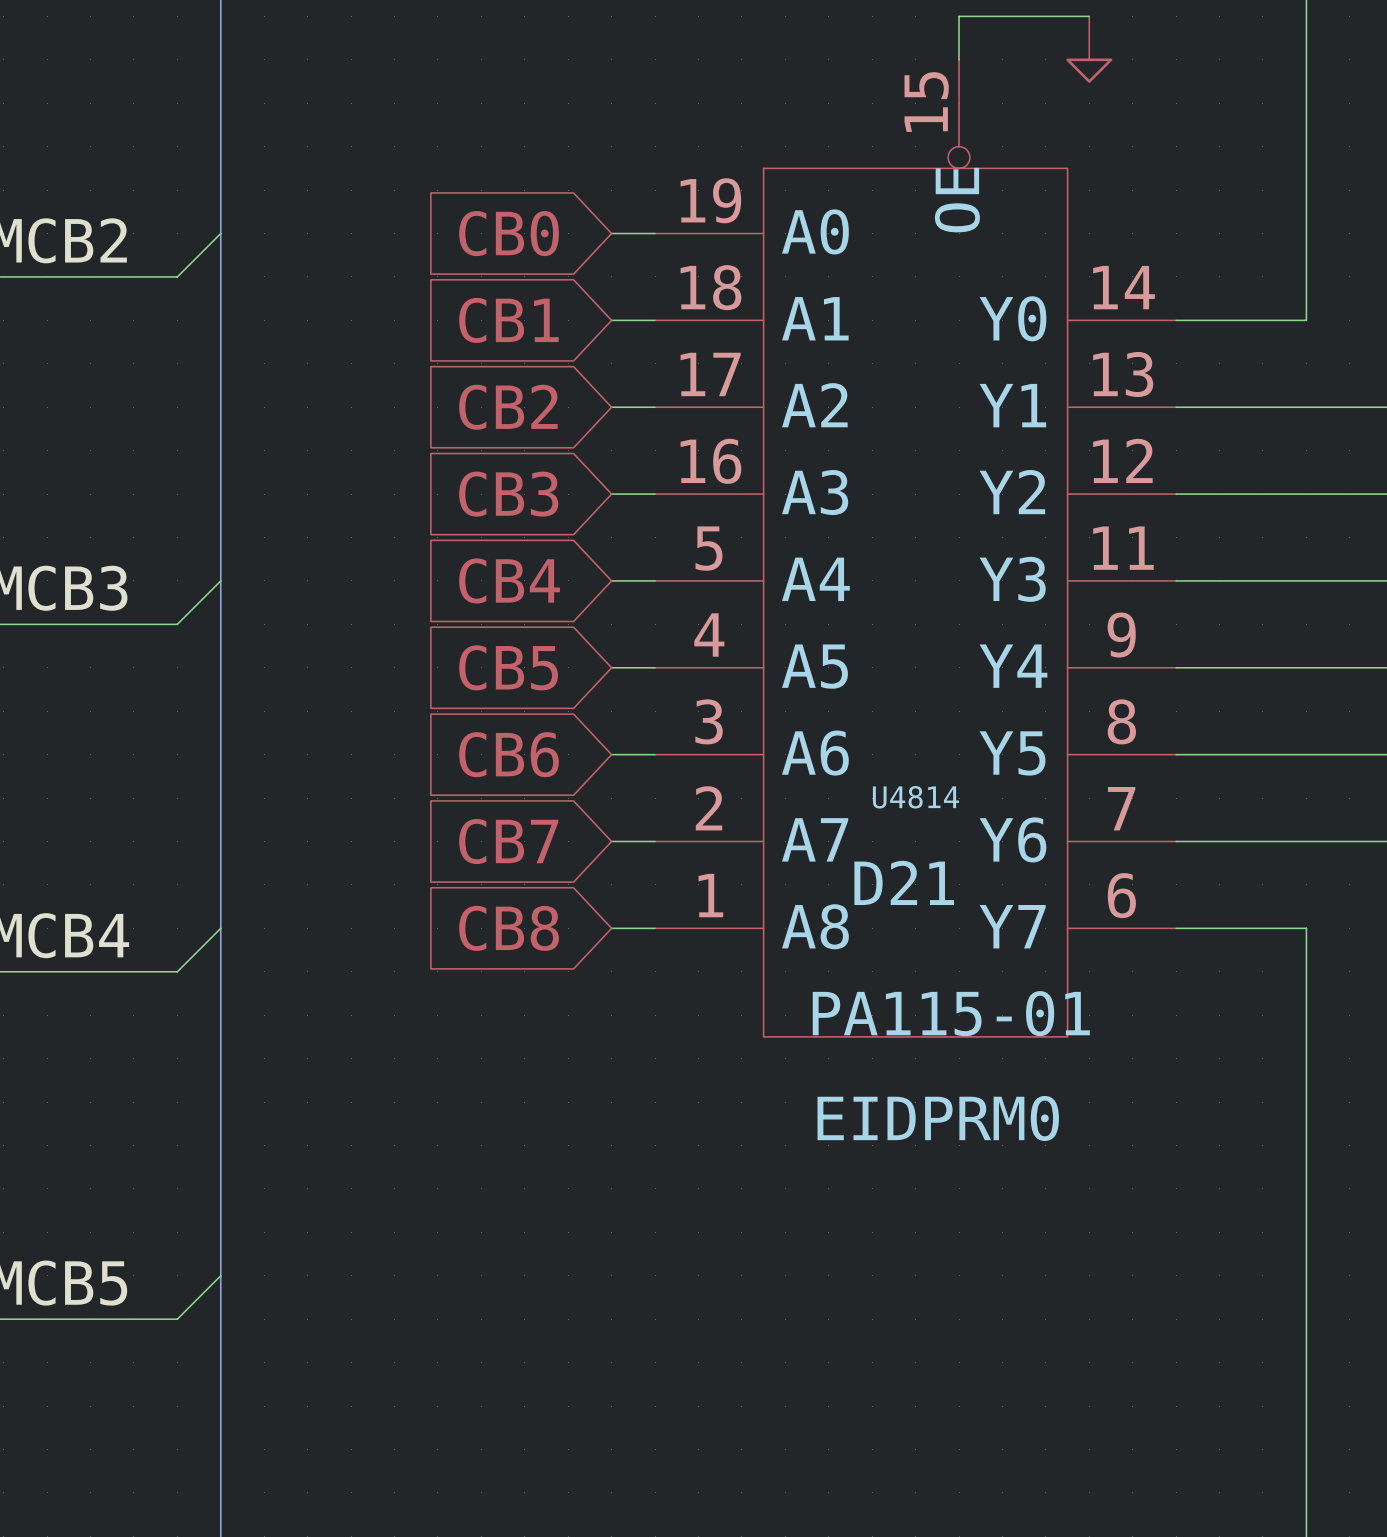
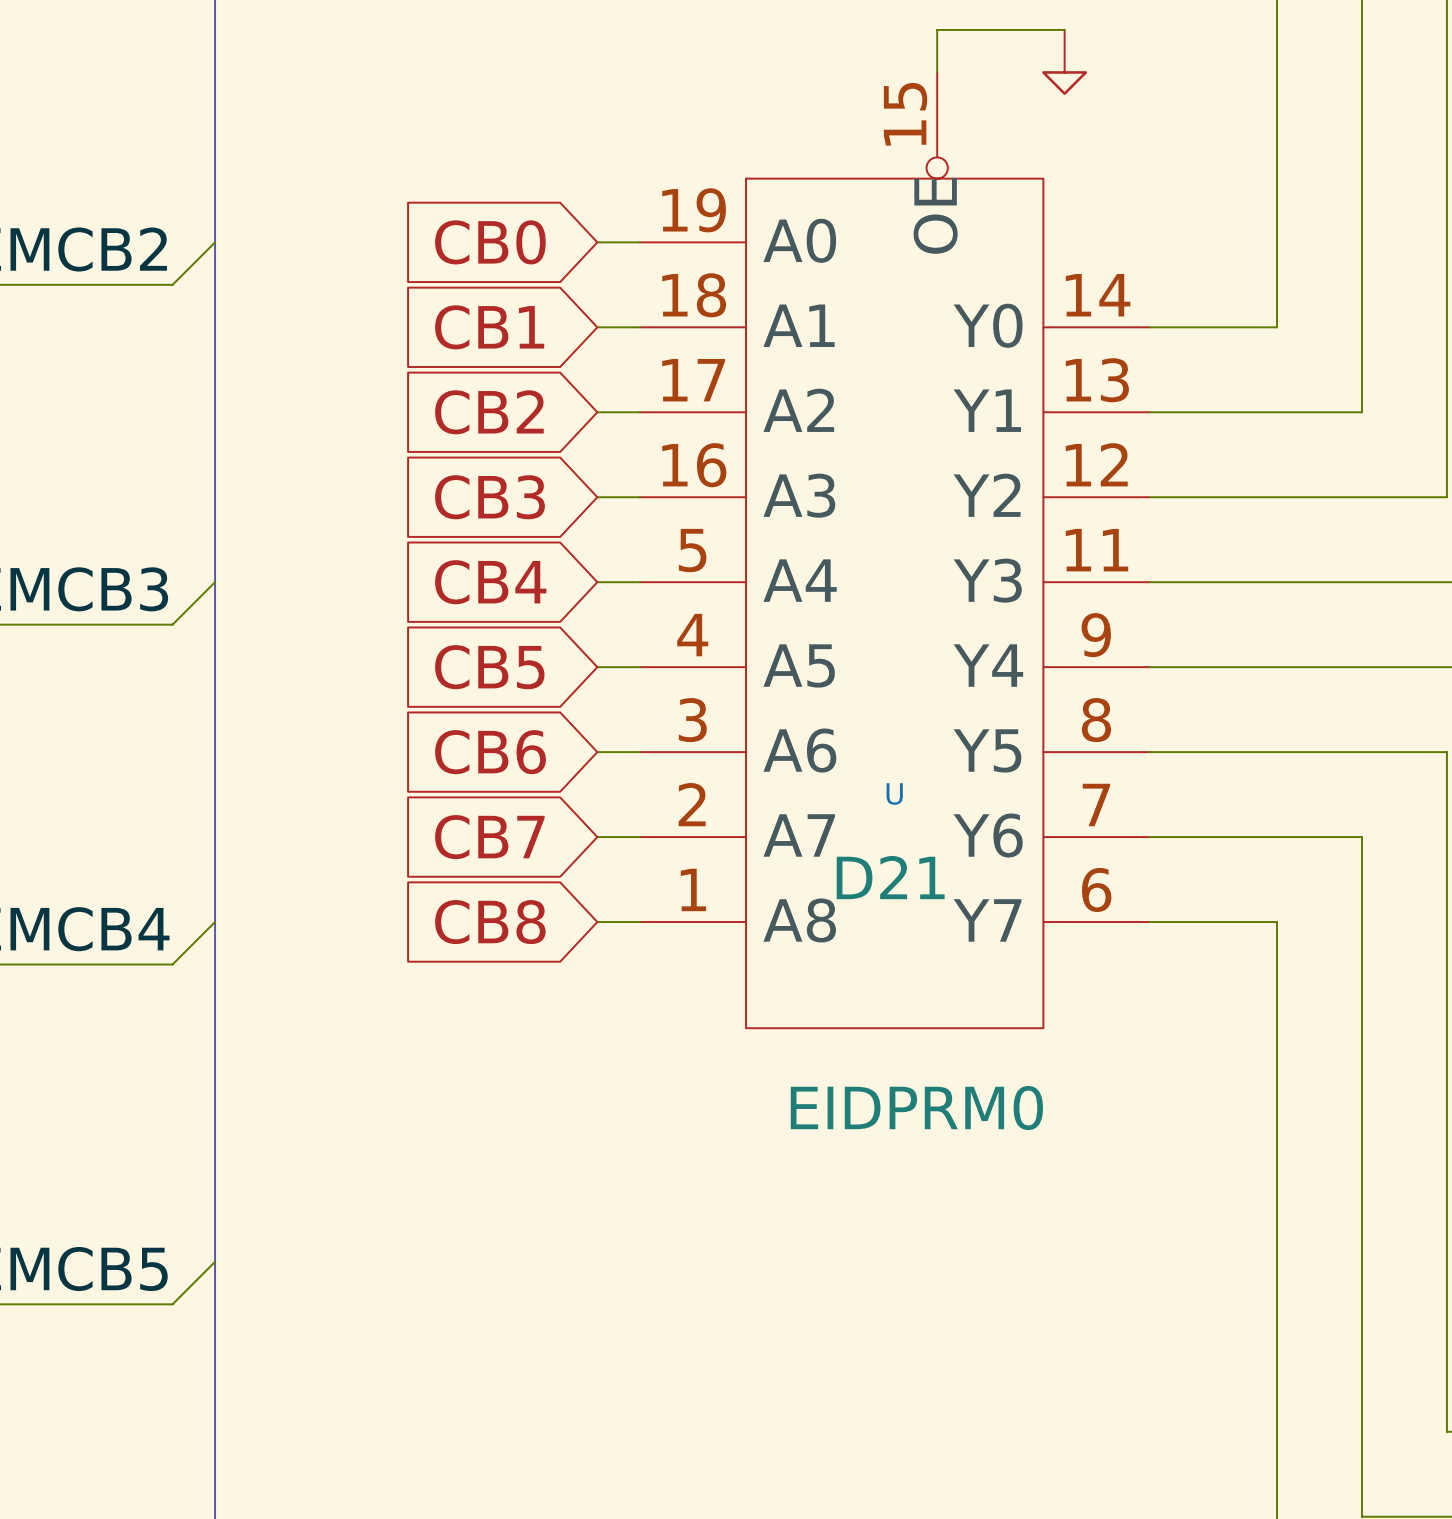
U4814 name: U4814 (915, 797) -> U (894, 794)
U4814 value: PA115-01 (951, 1013) -> none

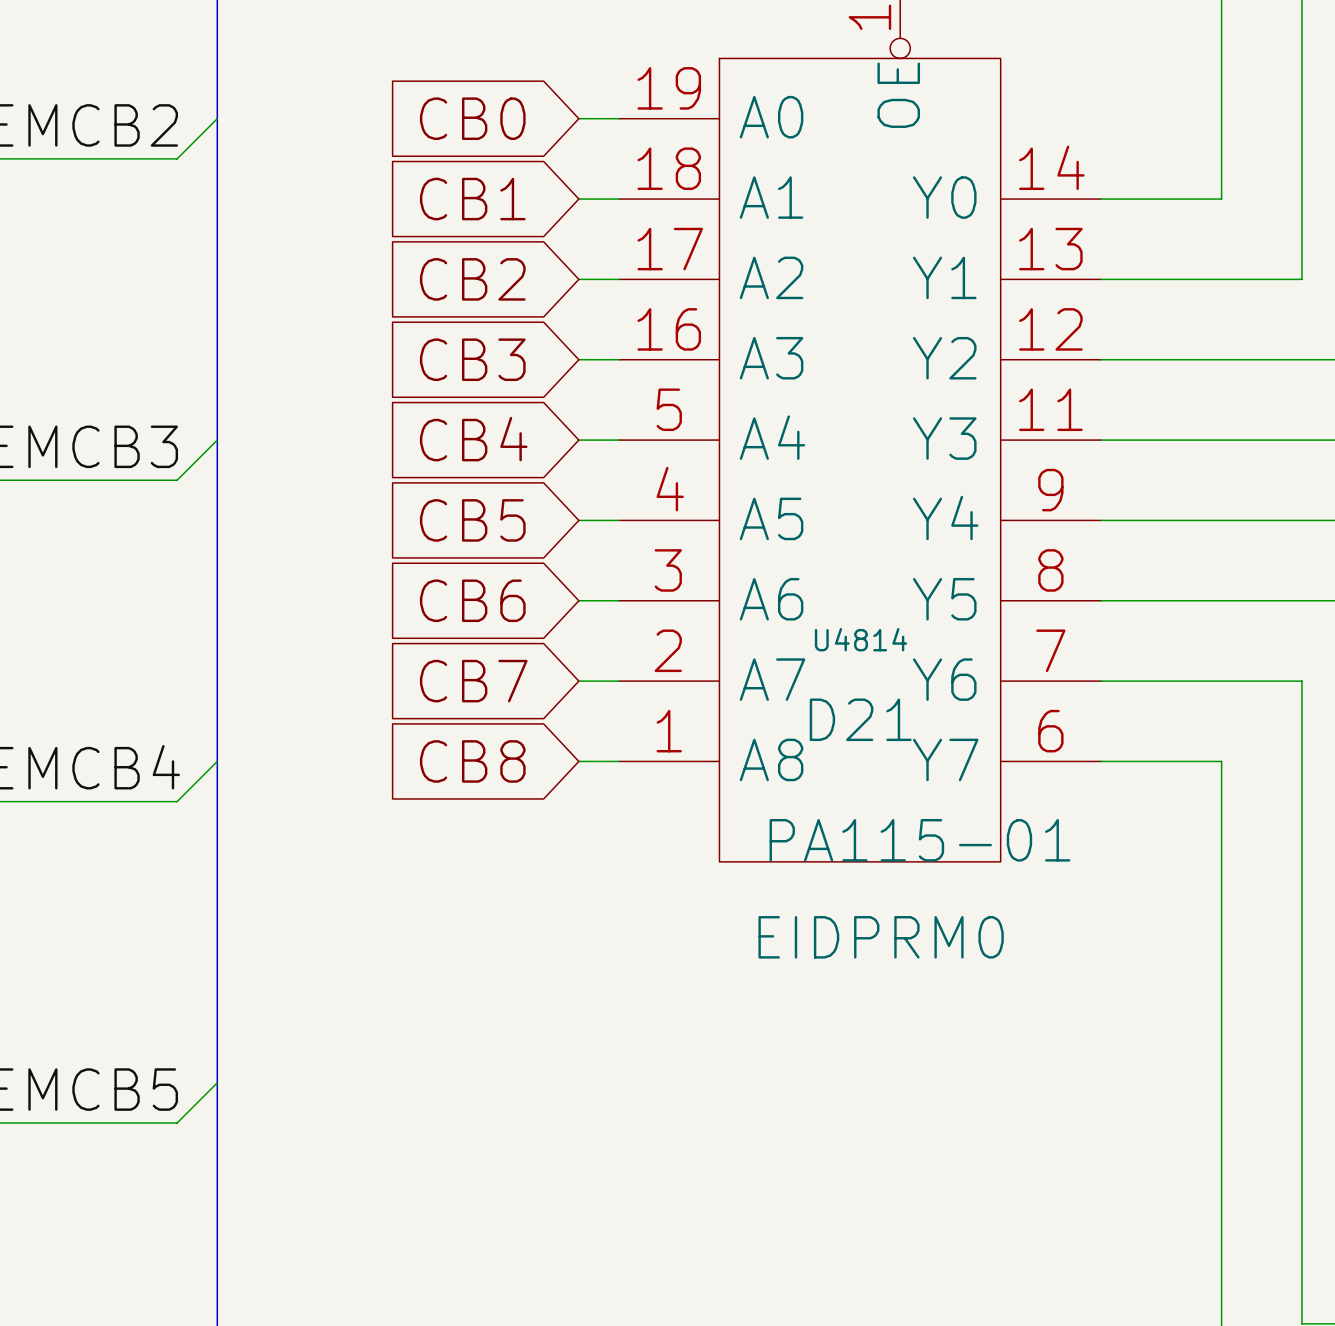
U name: U (894, 794) -> U4814 (861, 639)
U value: none -> PA115-01 (919, 840)

